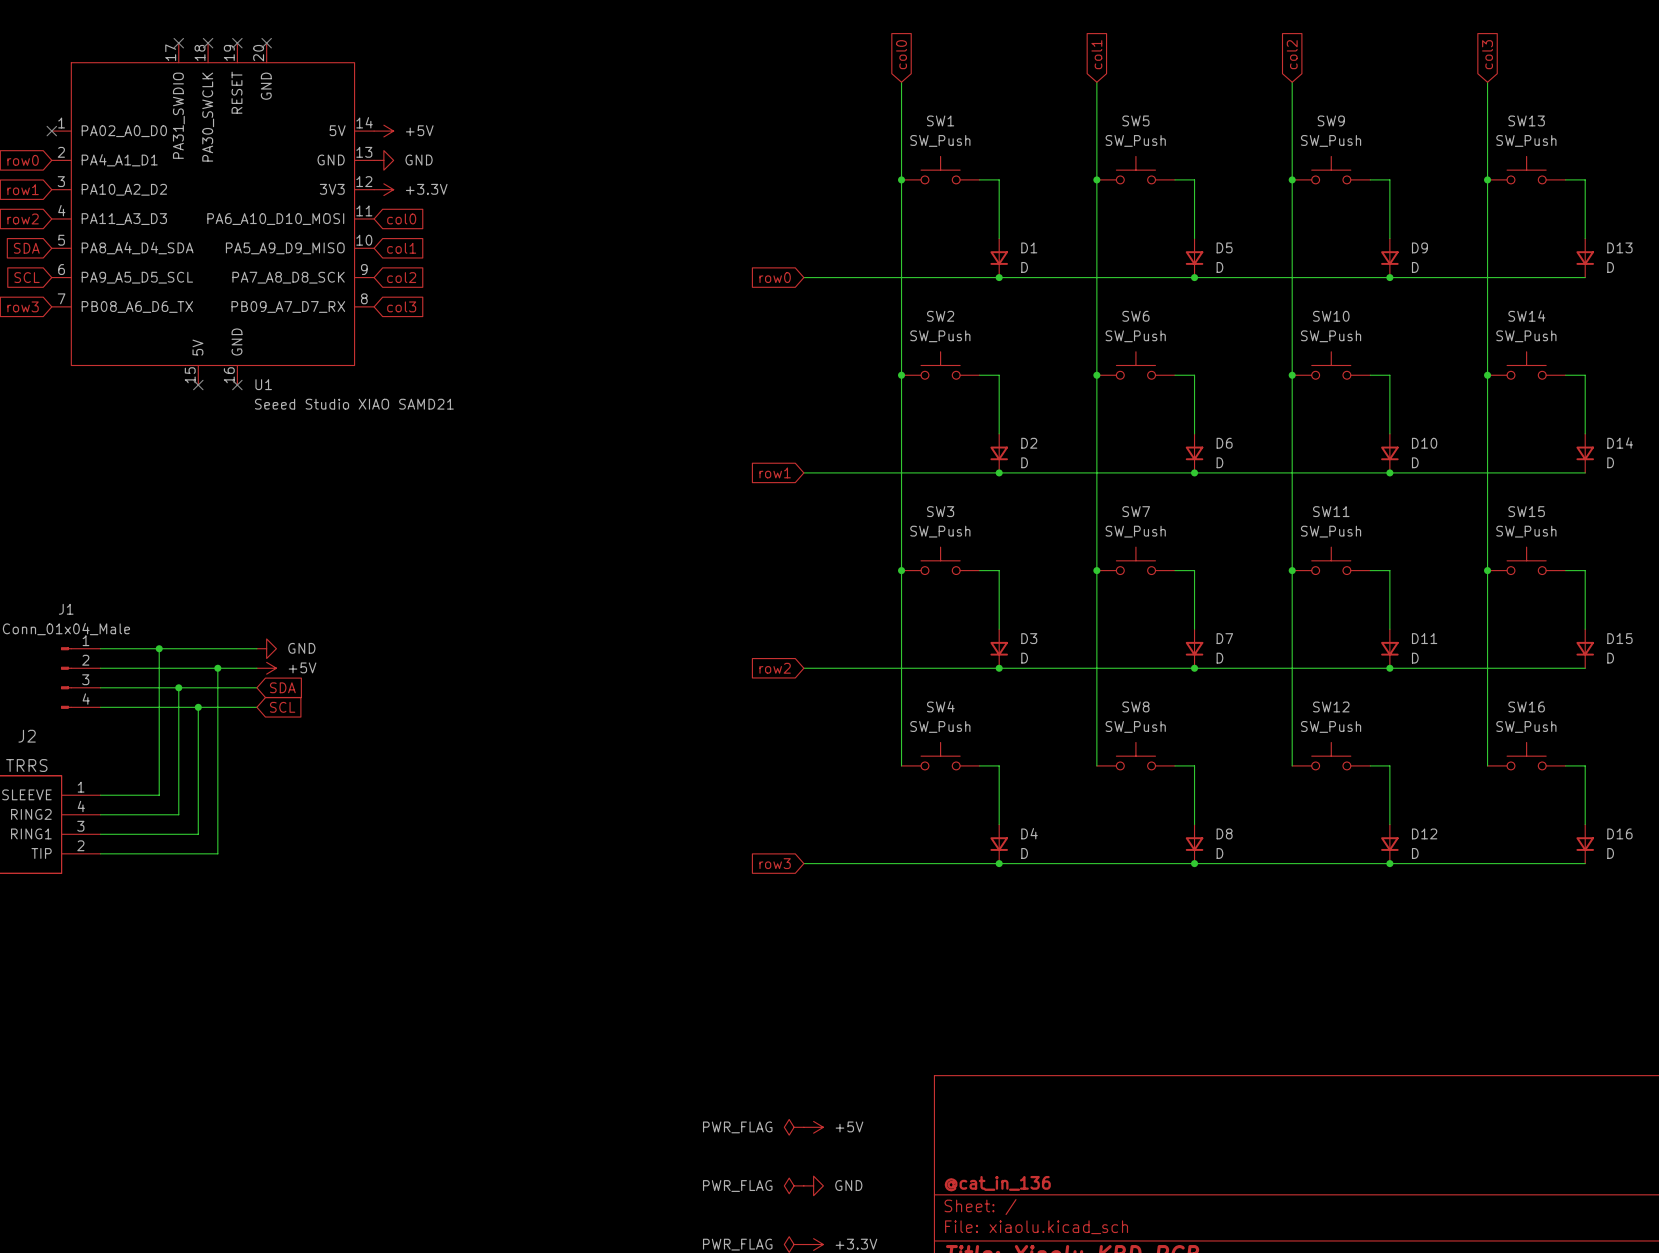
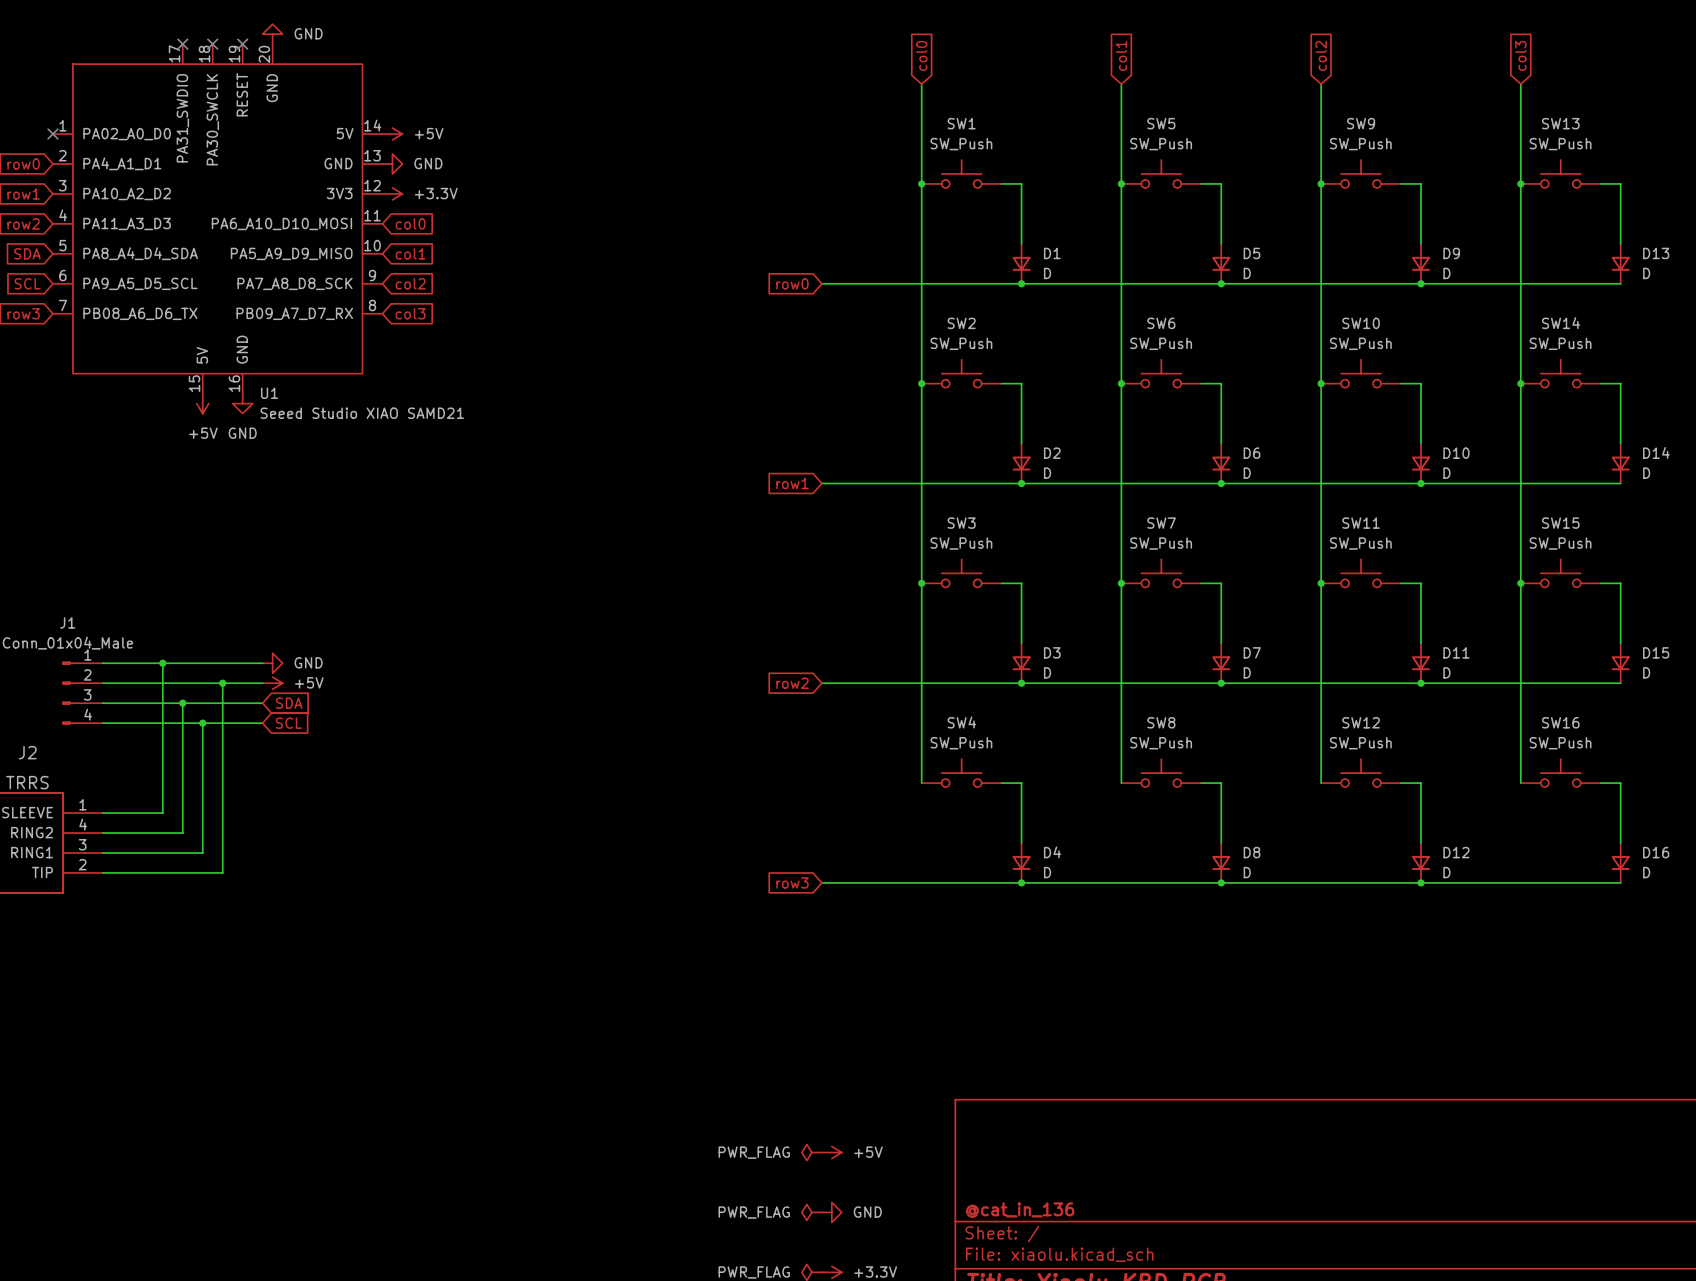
power symbol: none -> GND (272, 34)
no-connect mark: (266, 43) -> none
no-connect mark: (198, 385) -> none
no-connect mark: (237, 385) -> none
power symbol: none -> +5V (202, 403)
power symbol: none -> GND (242, 403)

